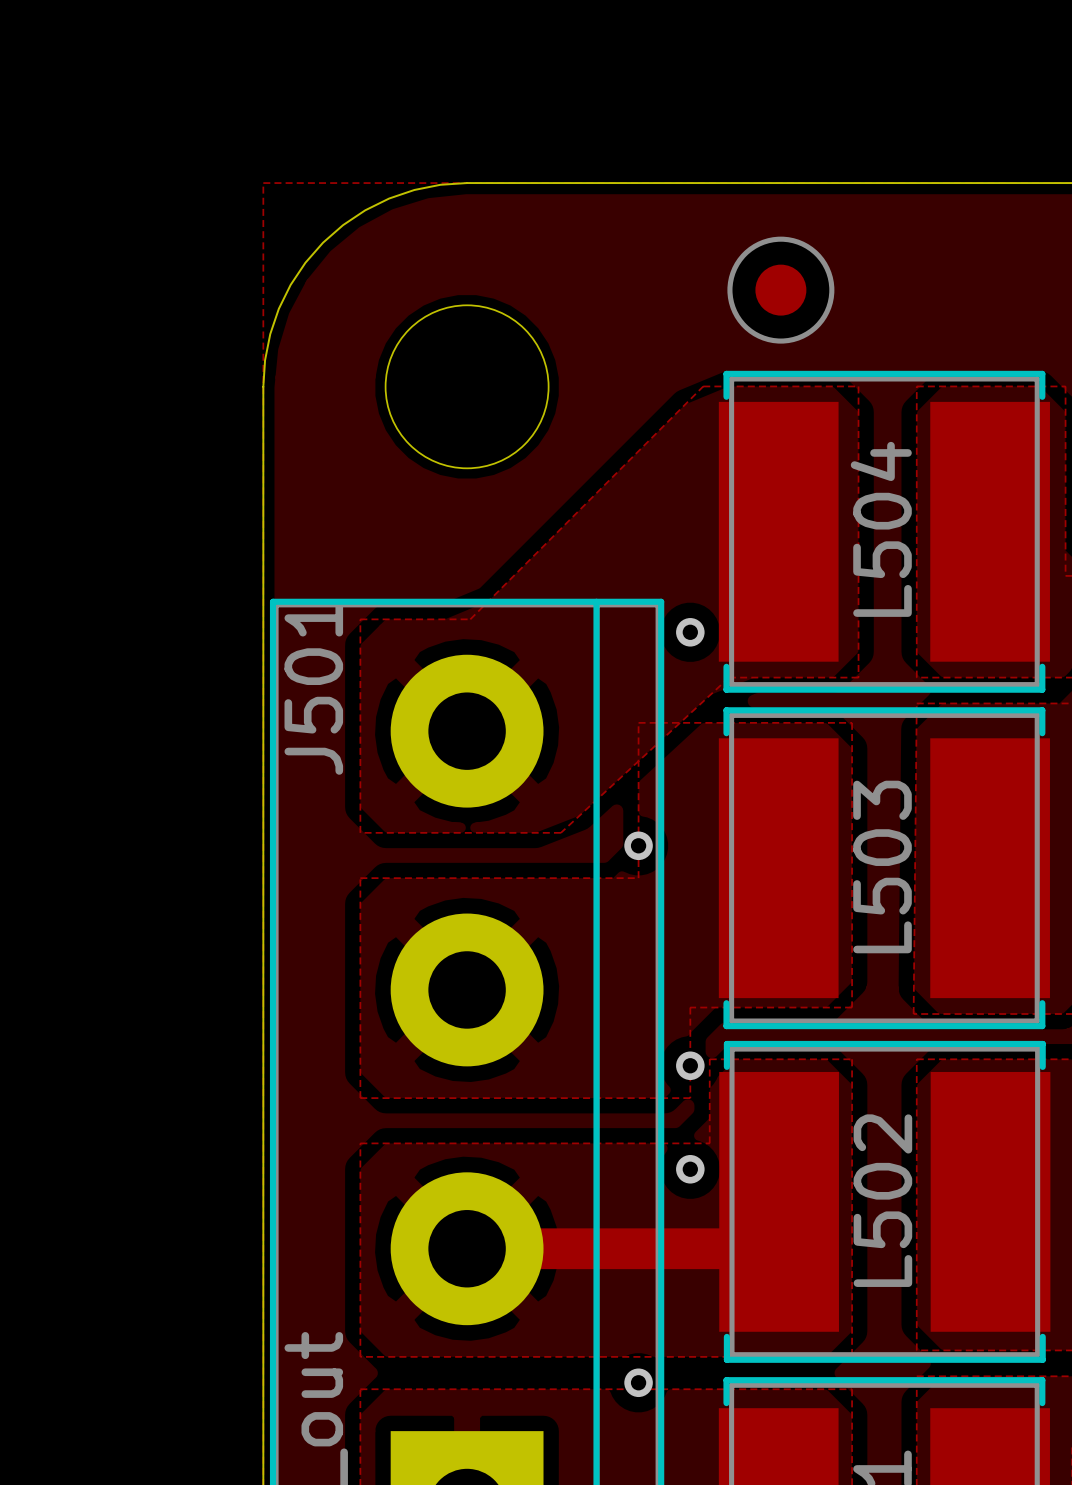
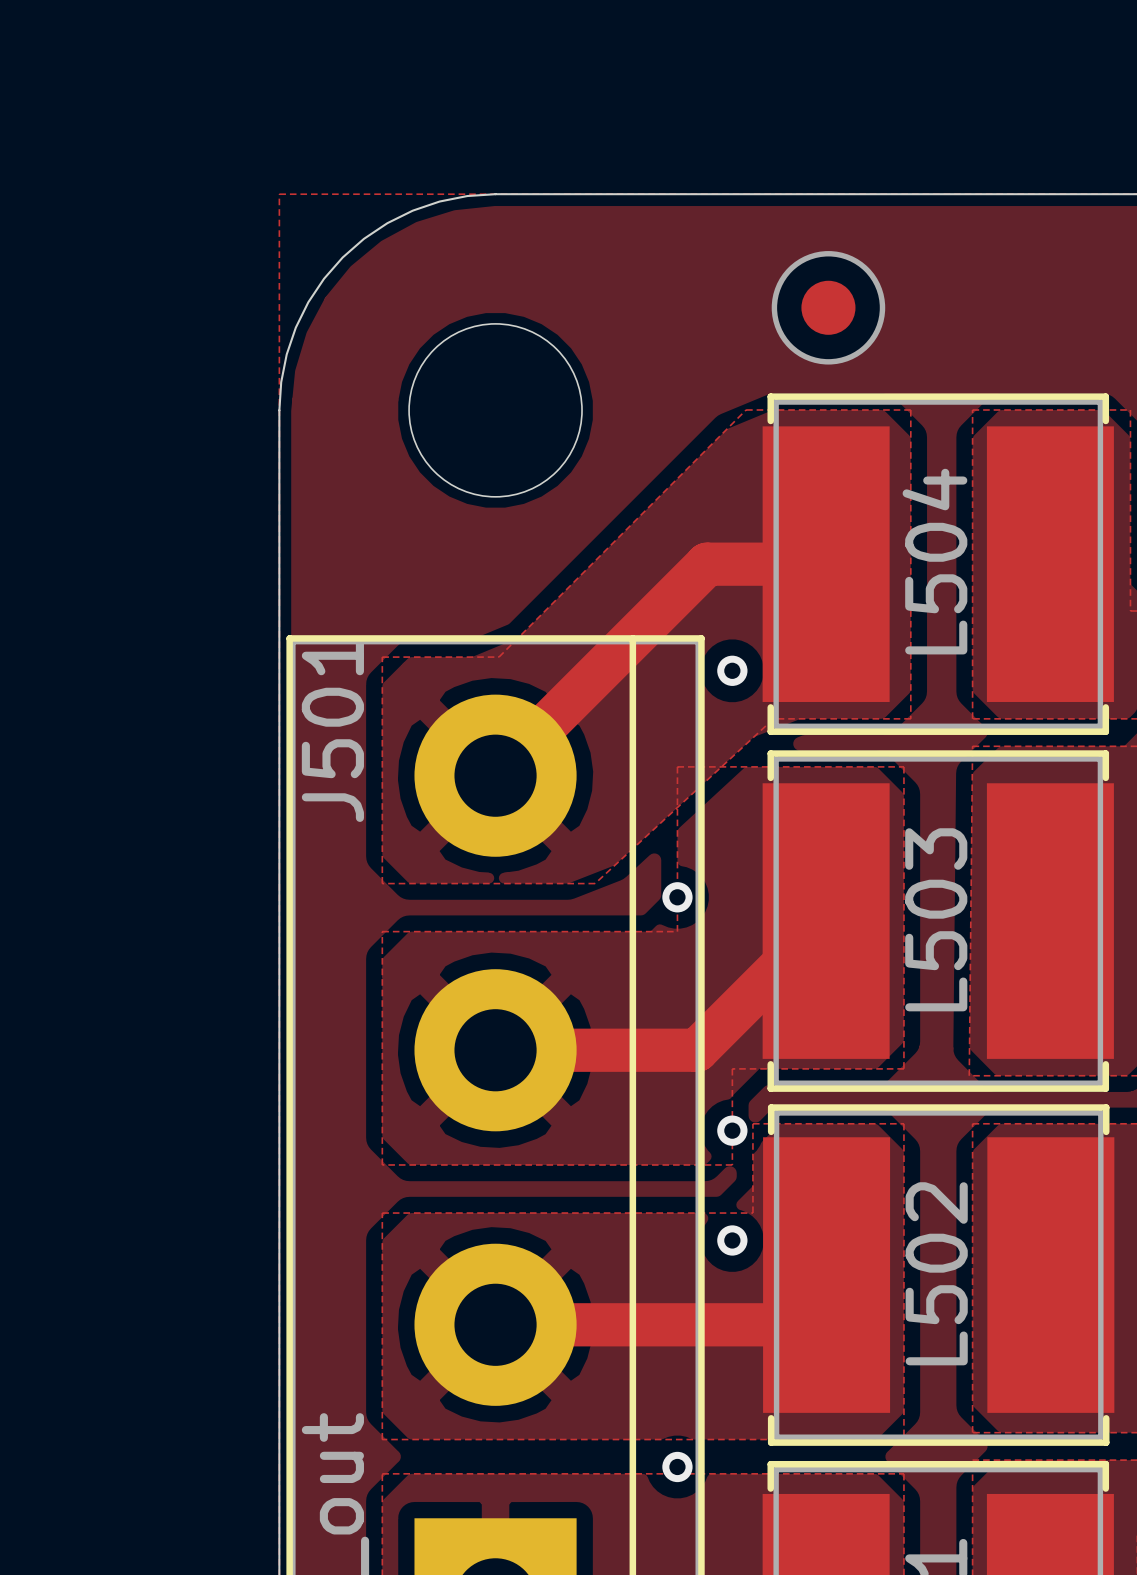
track: none -> (826, 564) (707, 564) (495, 775)
track: none -> (826, 921) (696, 1050) (495, 1050)

